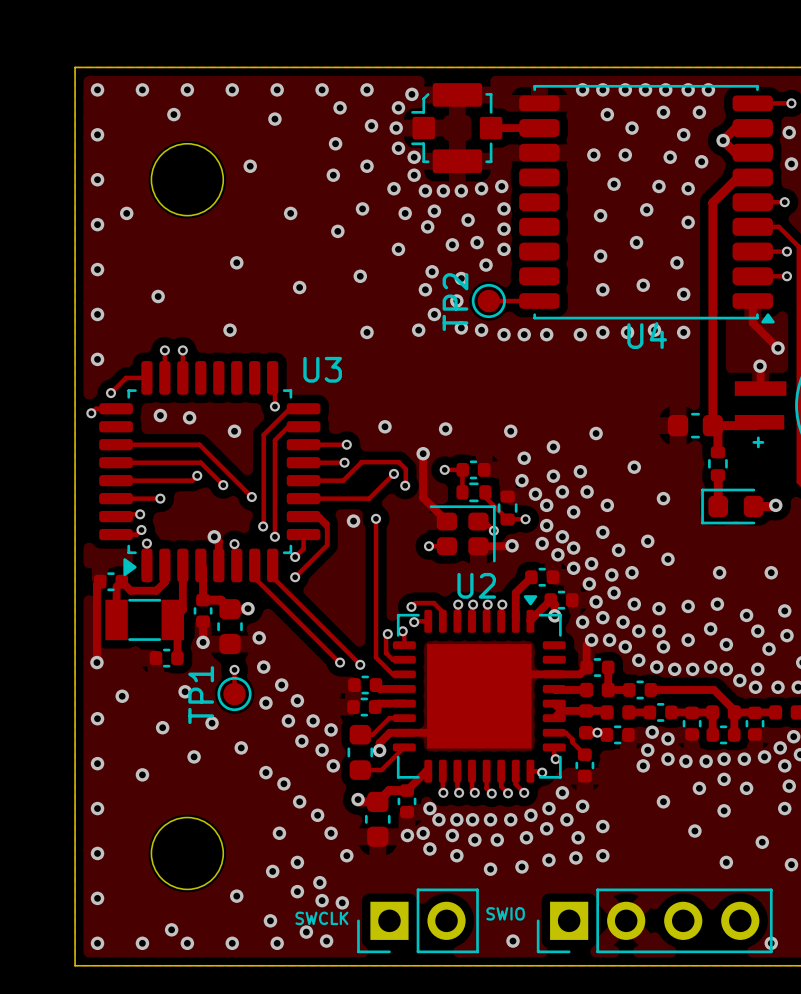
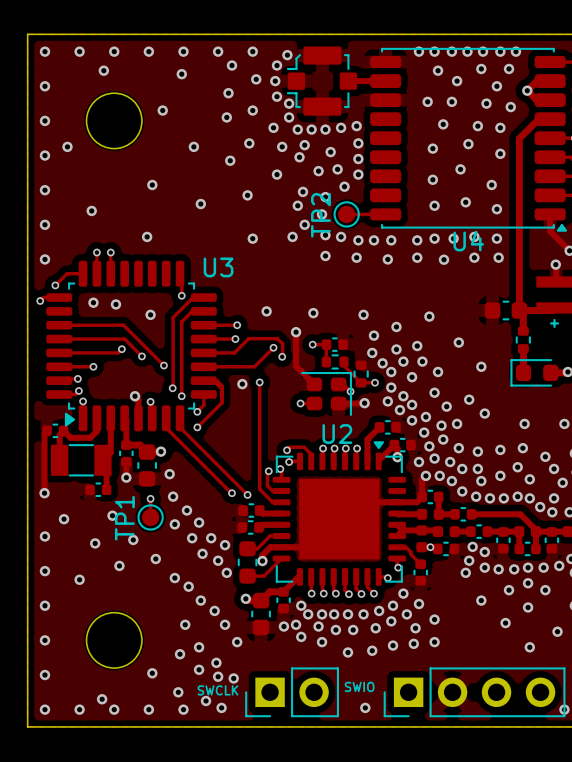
via: none -> (325, 255)
via: none -> (356, 257)
via: none -> (417, 257)
via: none -> (474, 257)
via: none -> (498, 257)
via: none -> (387, 259)
via: none -> (444, 259)

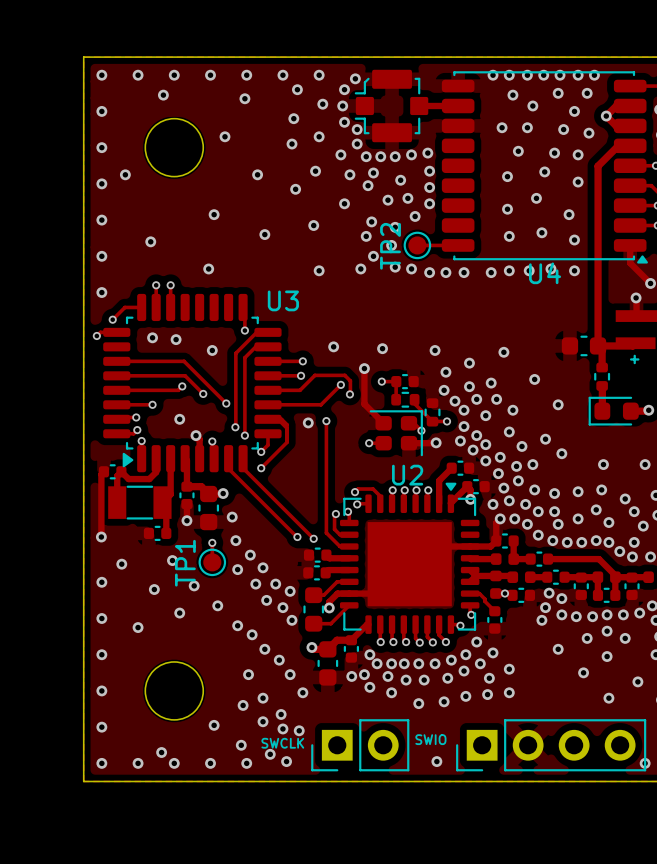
via: (325, 255) -> none
via: (356, 257) -> none
via: (417, 257) -> none
via: (474, 257) -> none
via: (498, 257) -> none
via: (387, 259) -> none
via: (444, 259) -> none
via: none -> (179, 419)

